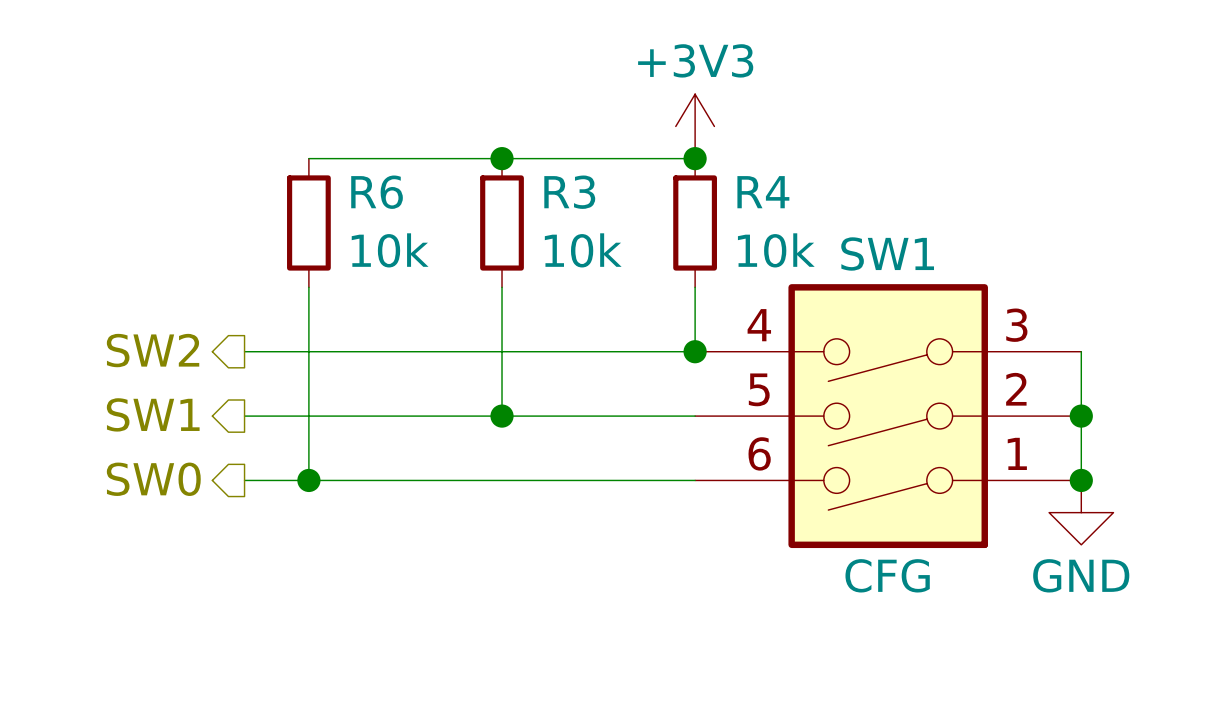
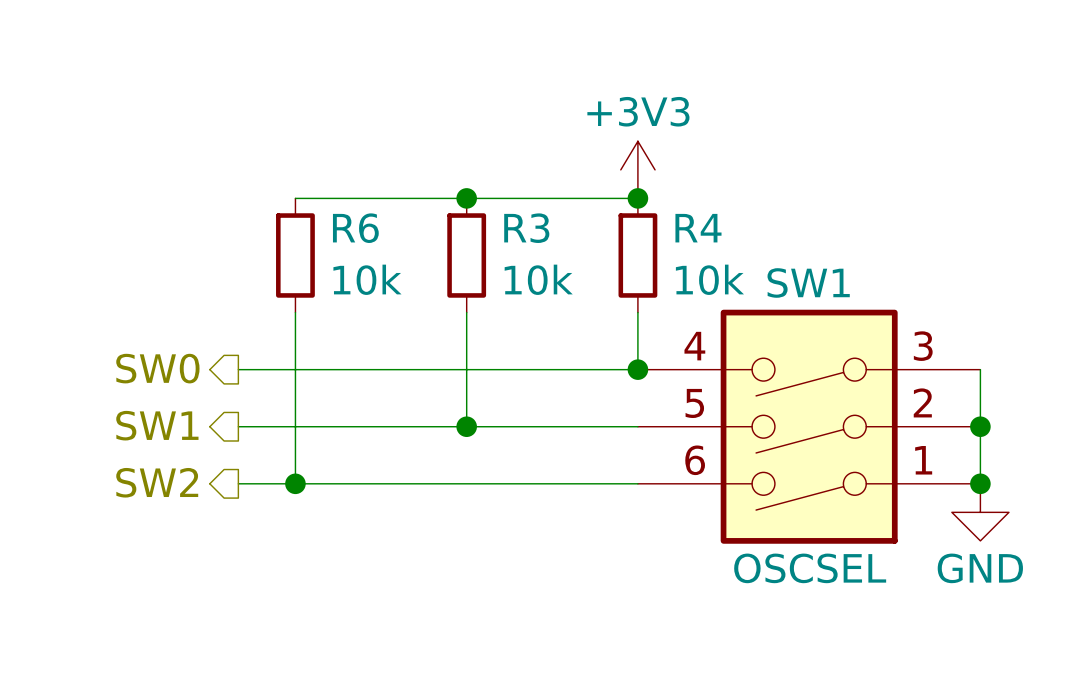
hierarchical label: SW2 (153, 350) -> SW0 (157, 368)
hierarchical label: SW0 (153, 479) -> SW2 (157, 482)
SW1 value: CFG (887, 575) -> OSCSEL (810, 568)

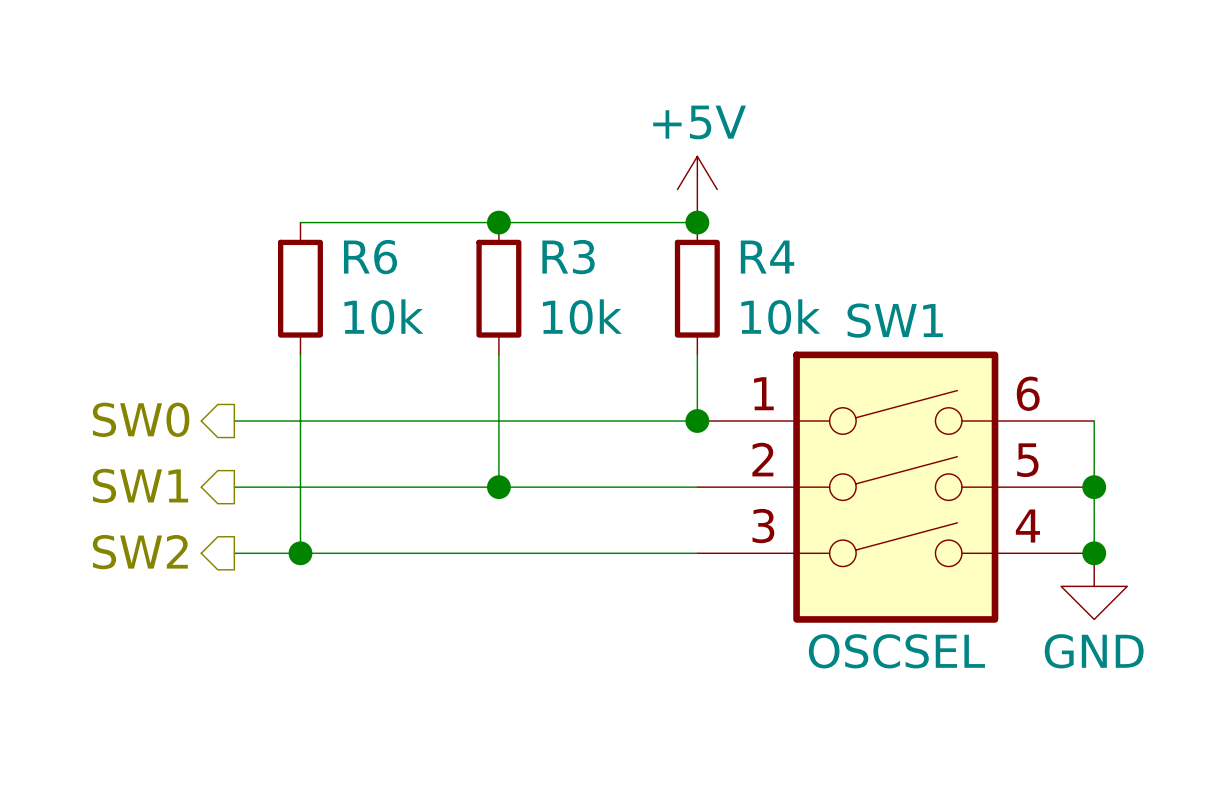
power symbol: +3V3 (637, 169) -> +5V (697, 189)
SW1 rotation: 0° (809, 426) -> 180° (895, 487)

